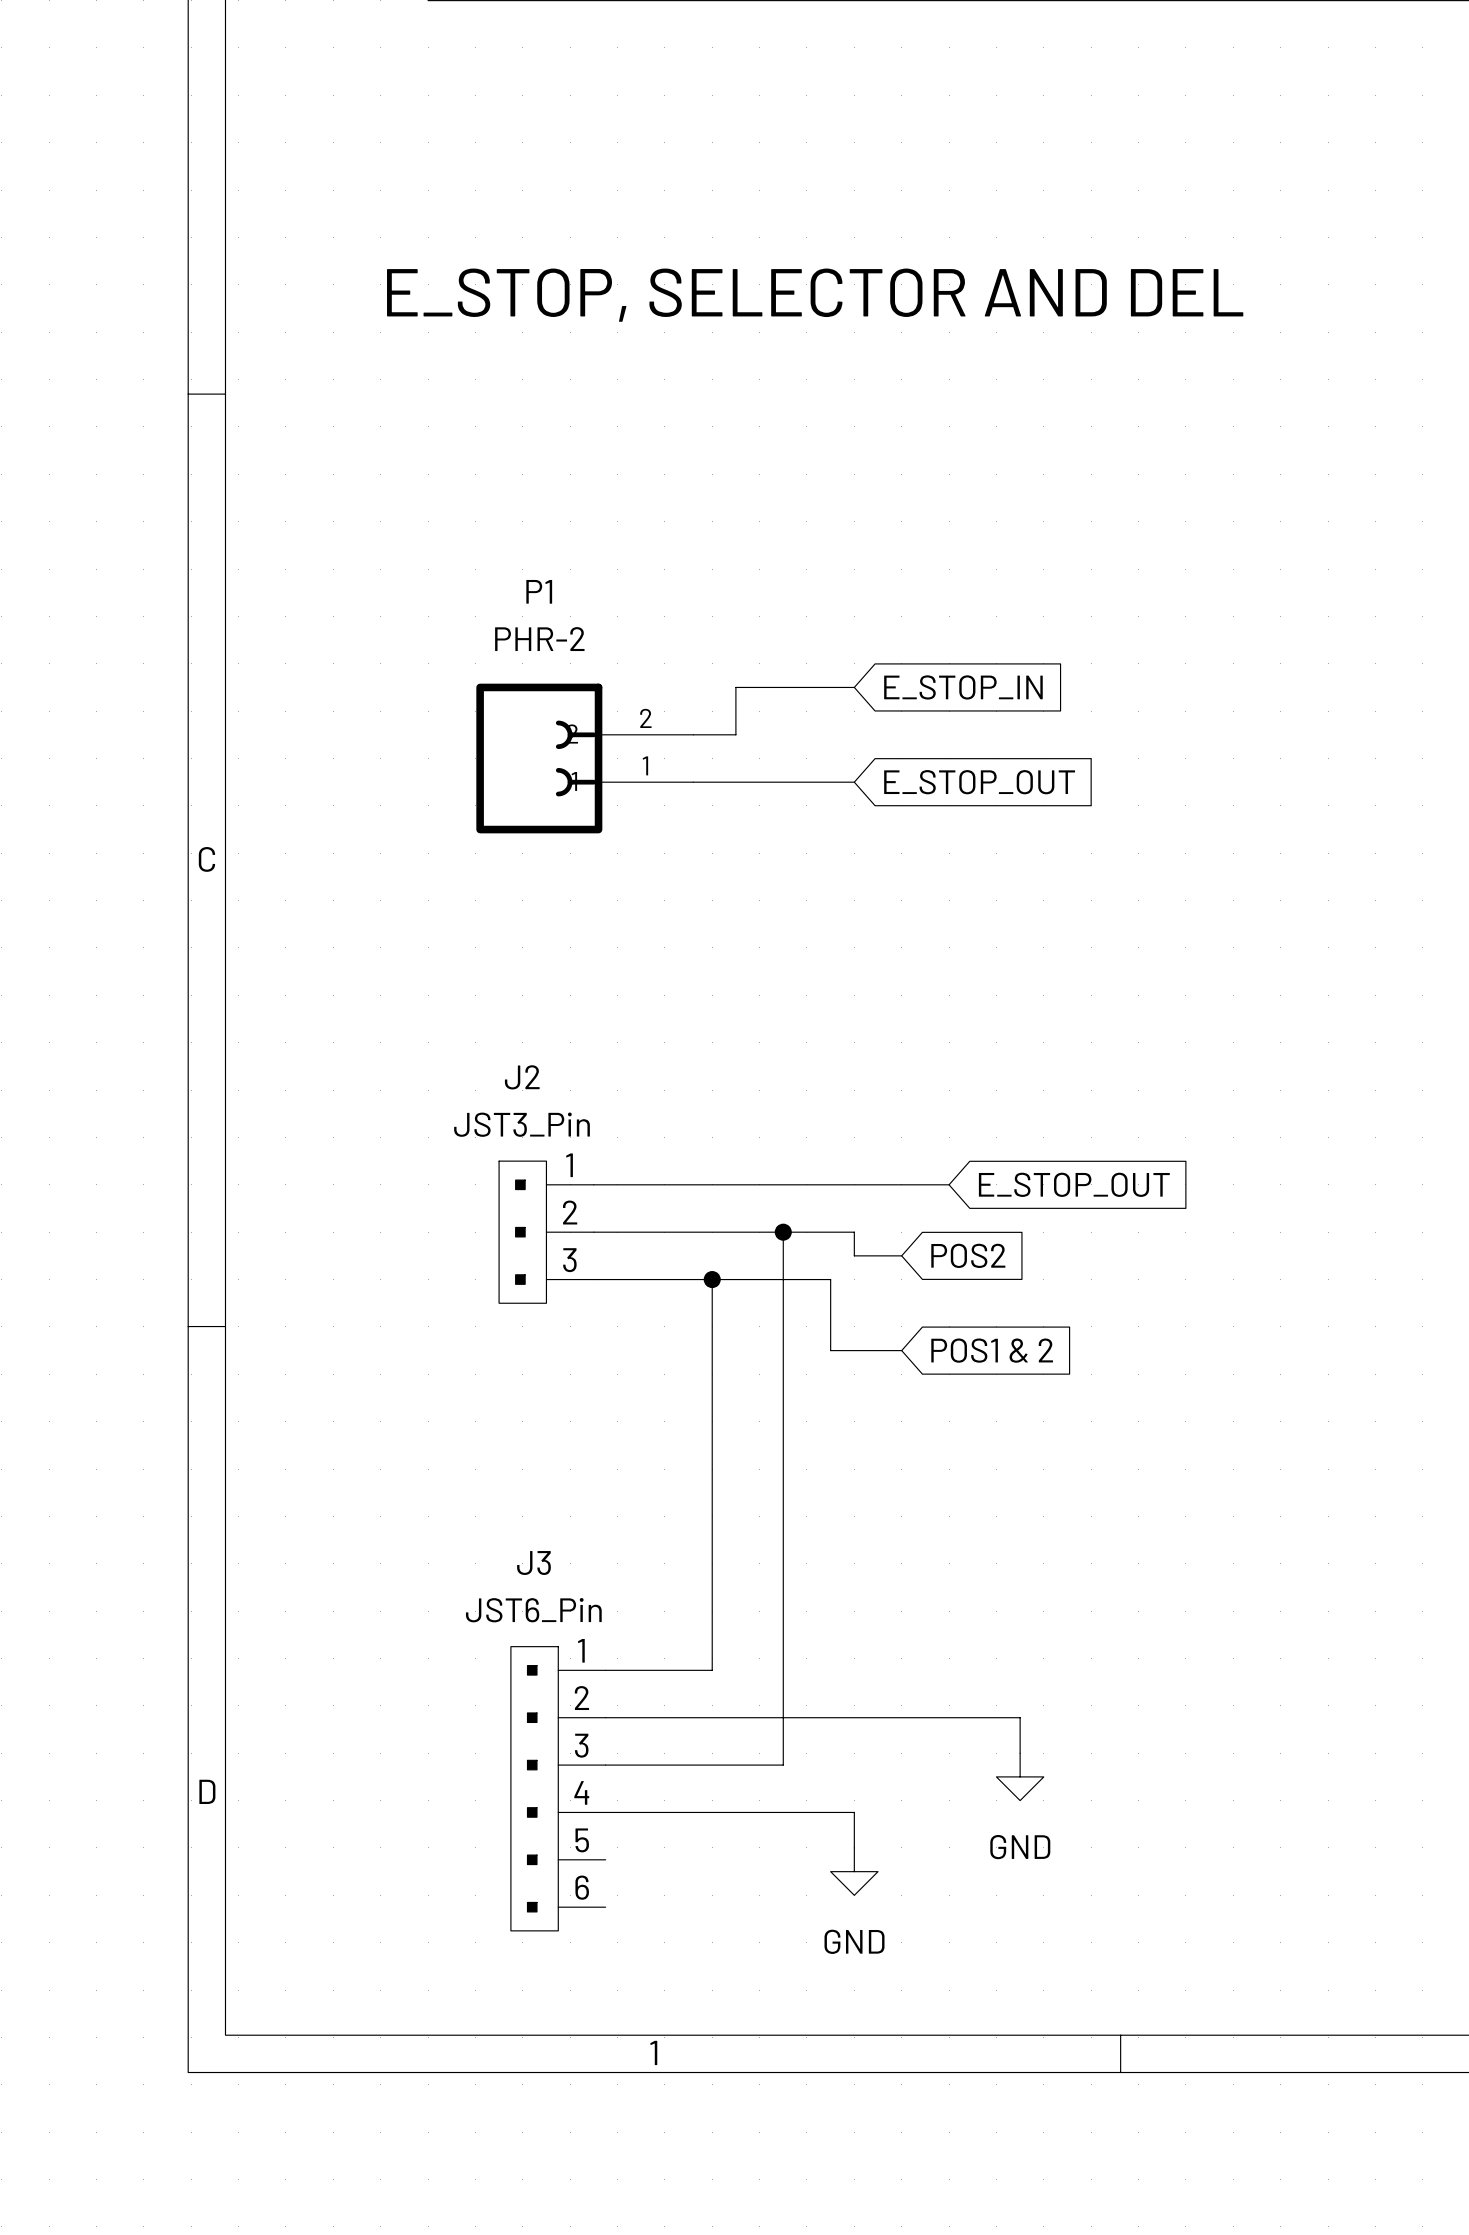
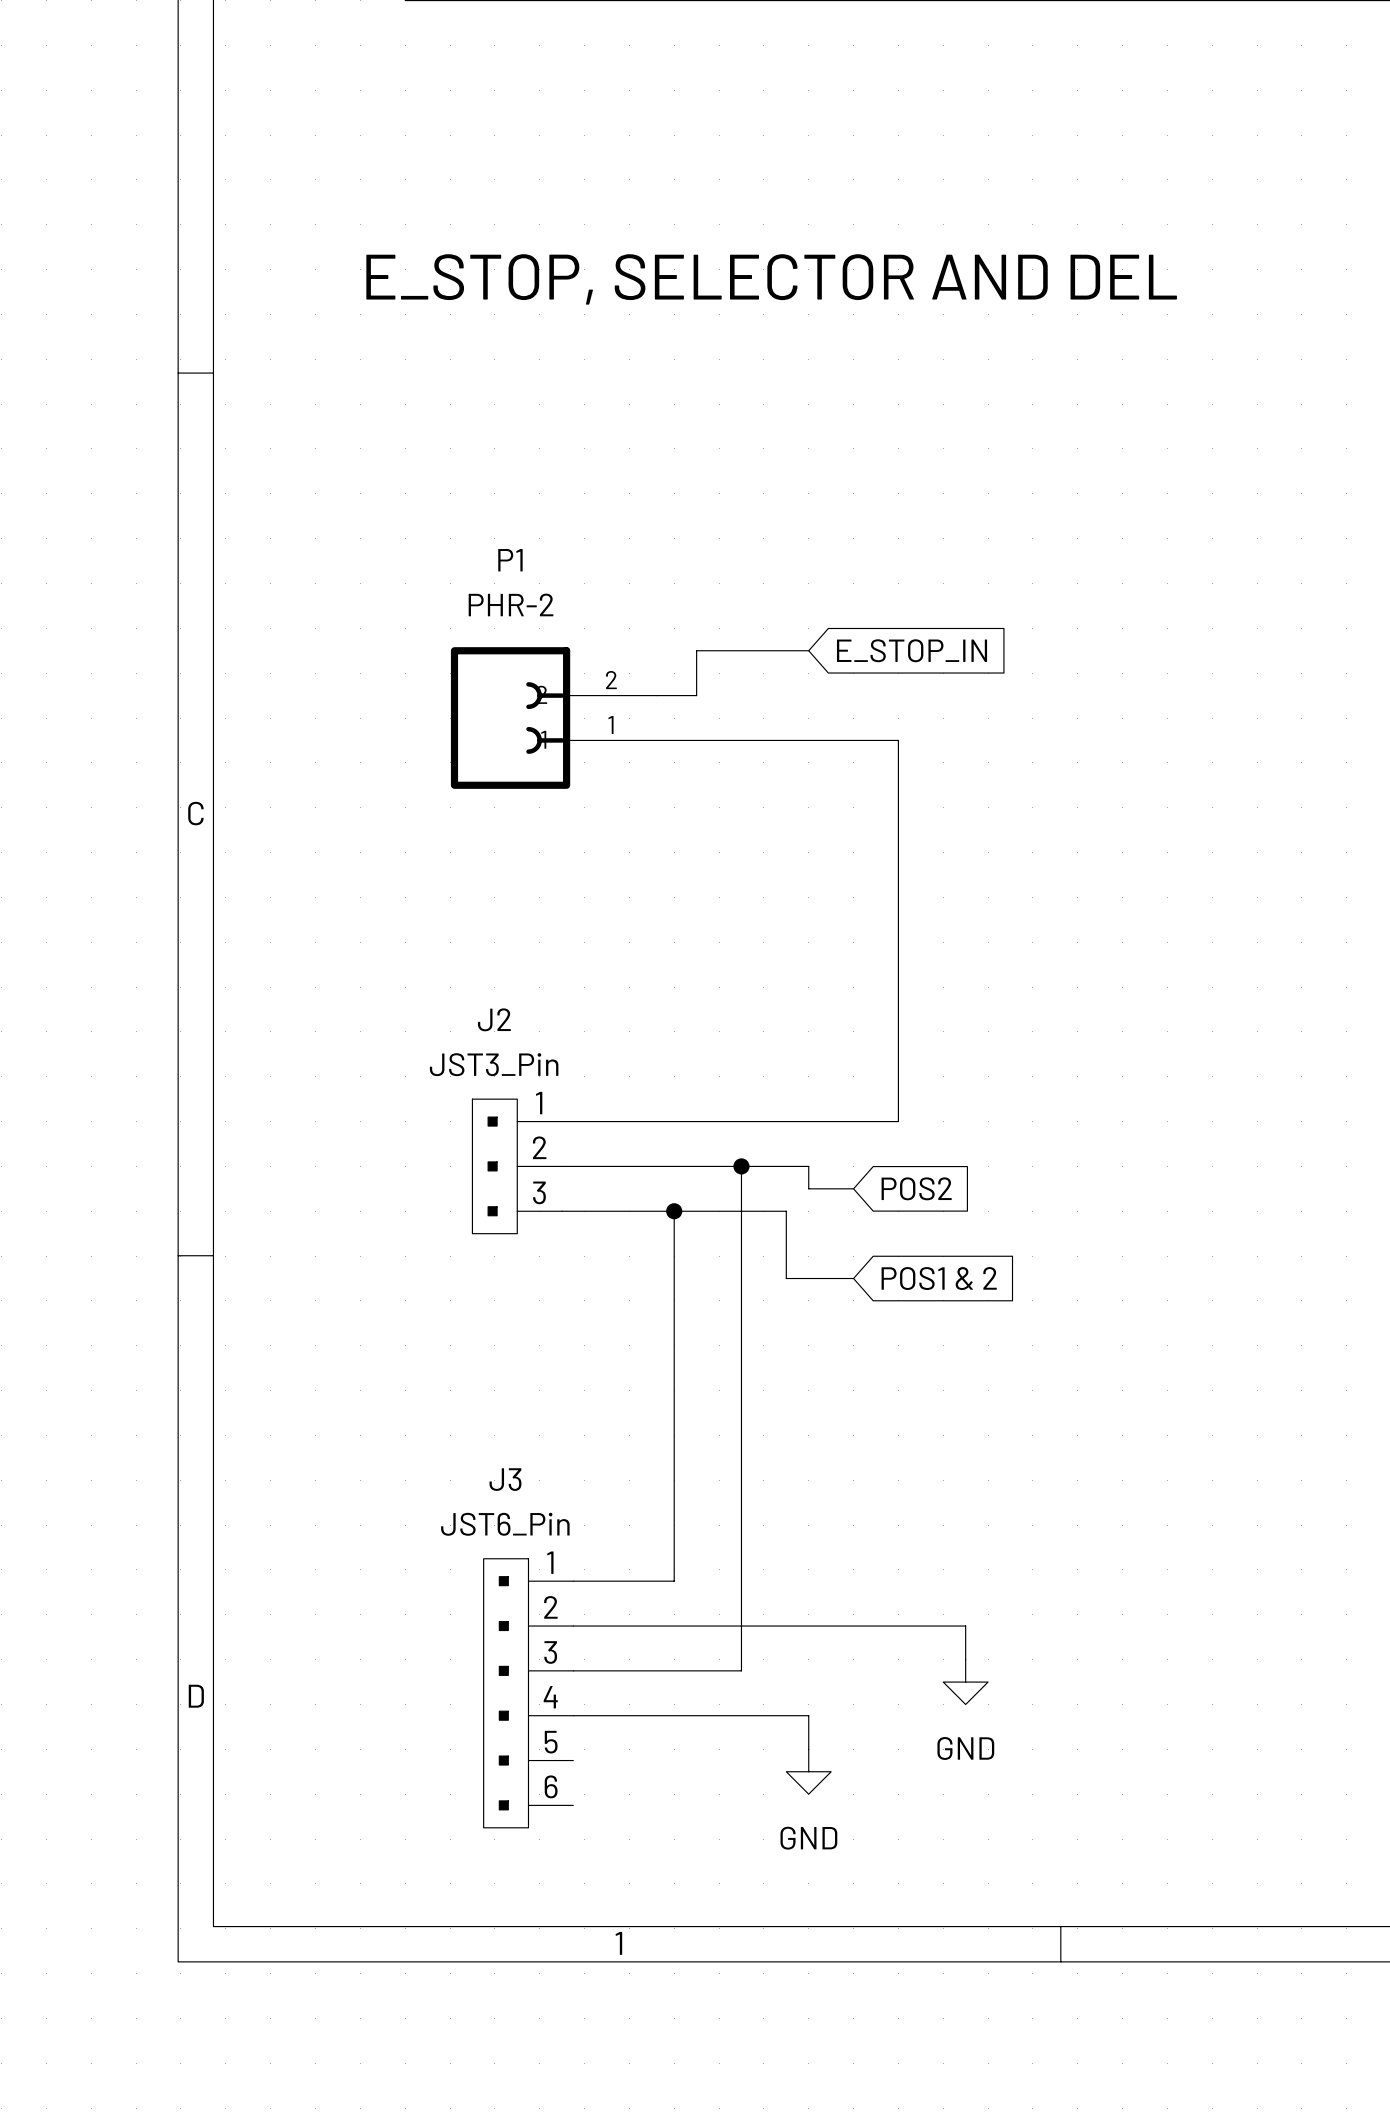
wire: none -> (808, 740) (898, 740) (898, 1121)
global label: E_STOP_OUT (979, 782) -> none
global label: E_STOP_OUT (1074, 1184) -> none

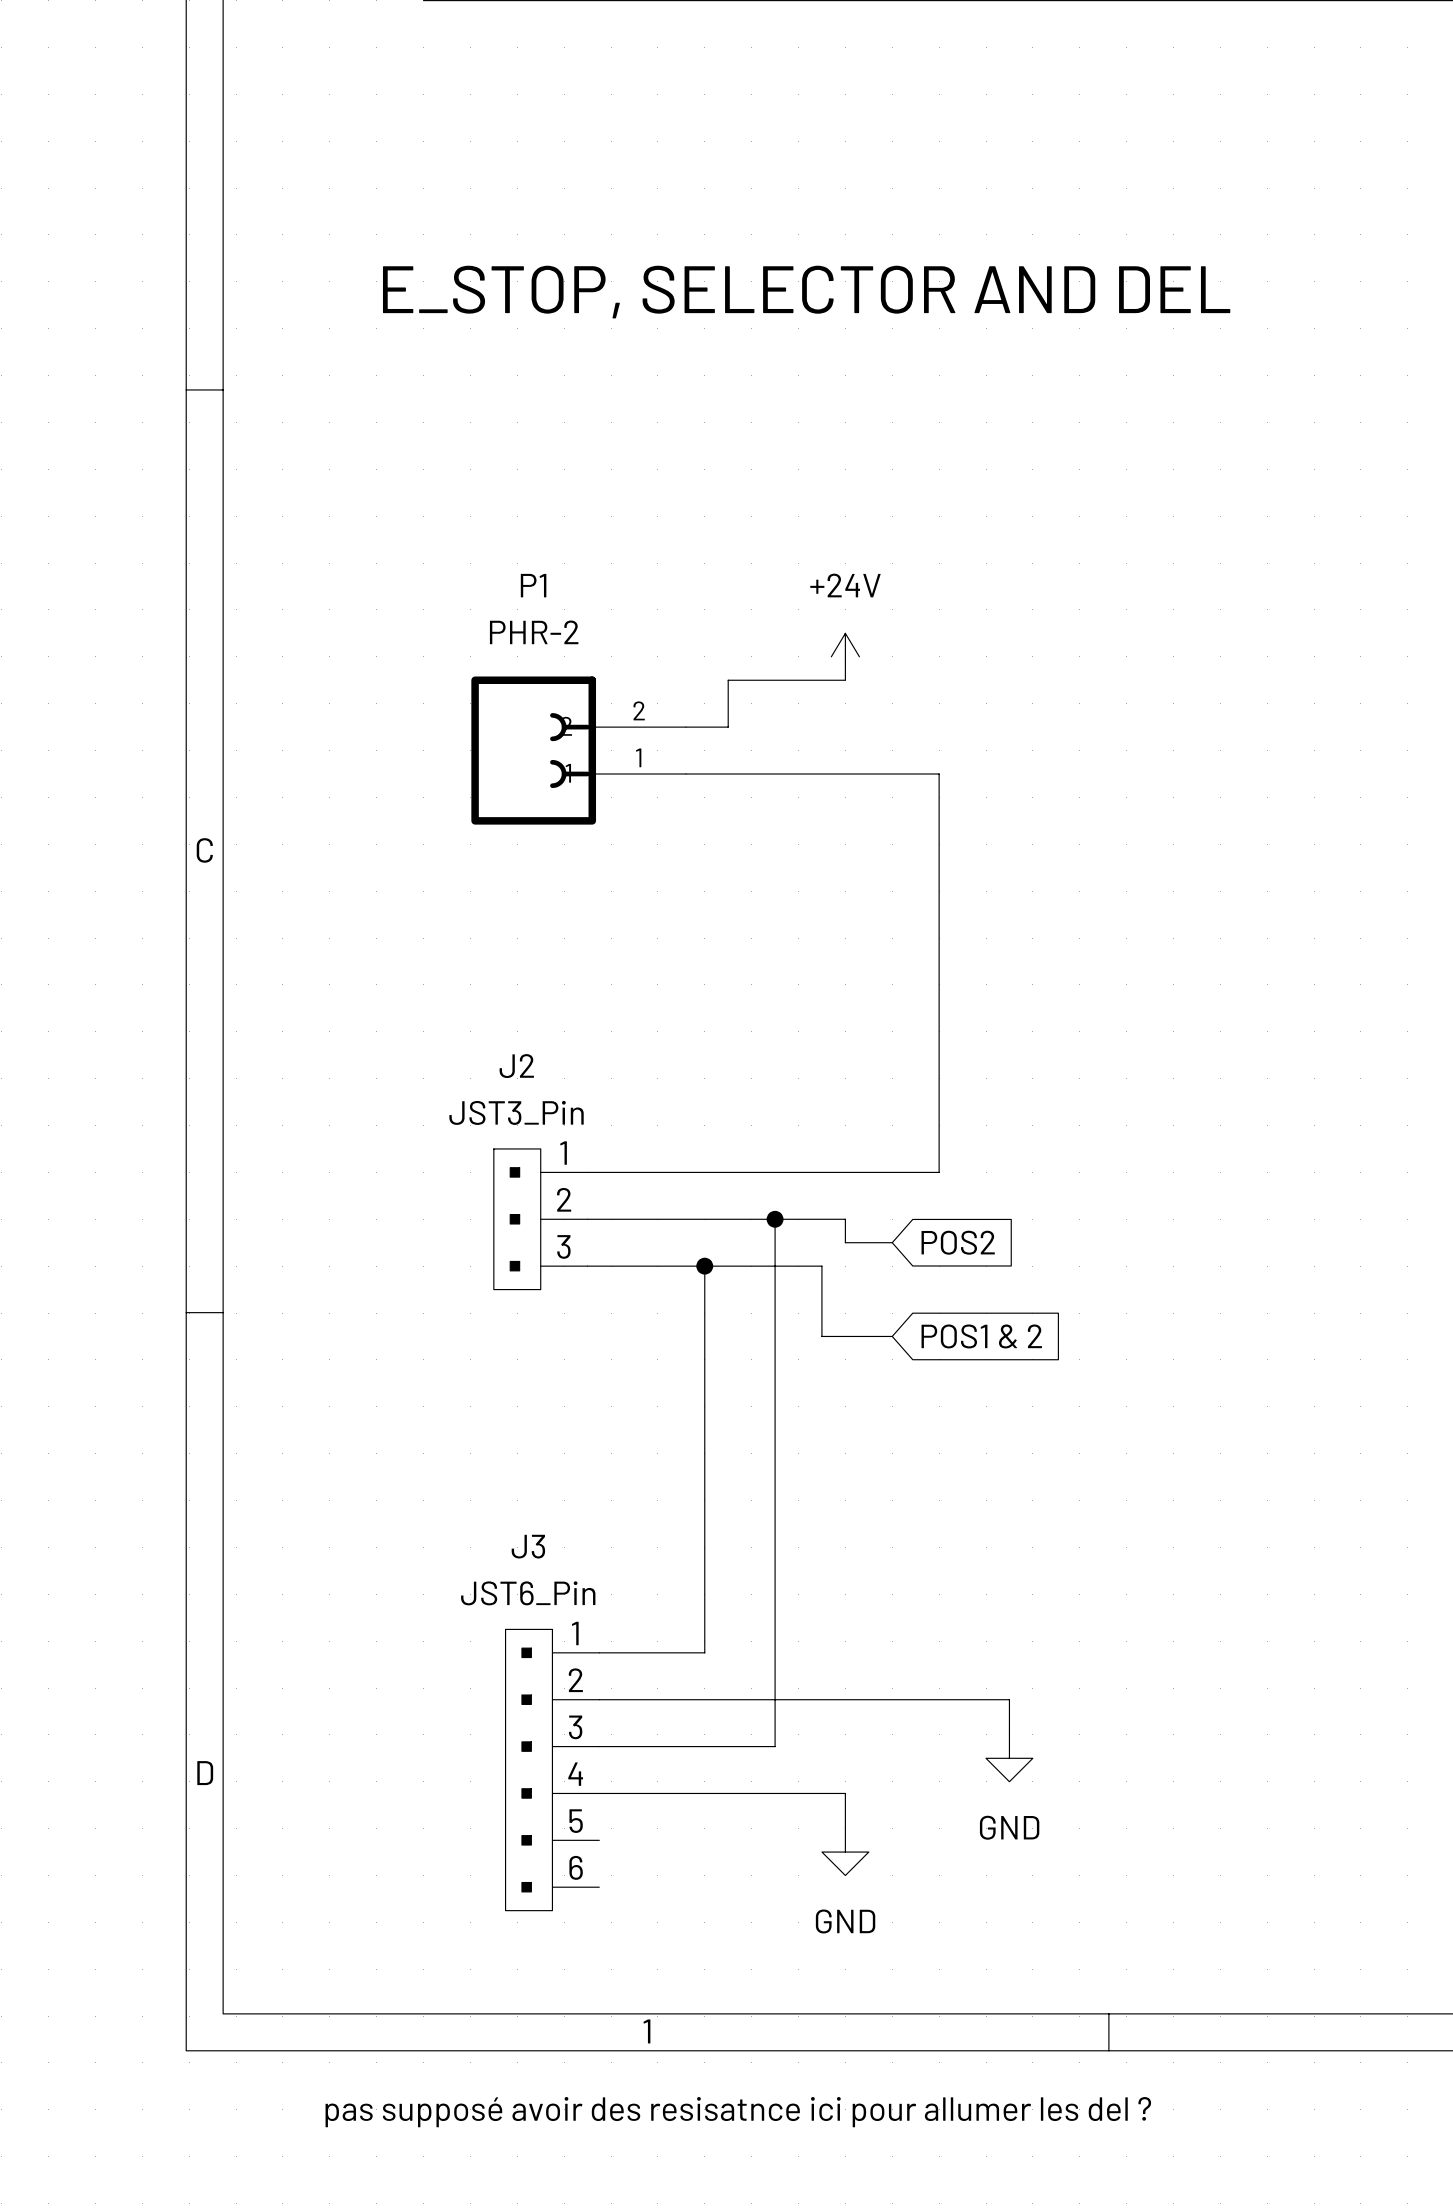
power symbol: none -> +24V (845, 656)
global label: E_STOP_IN (912, 650) -> none
text: none -> pas supposé avoir des resisatnce ici pour allumer les del ? (738, 2112)

